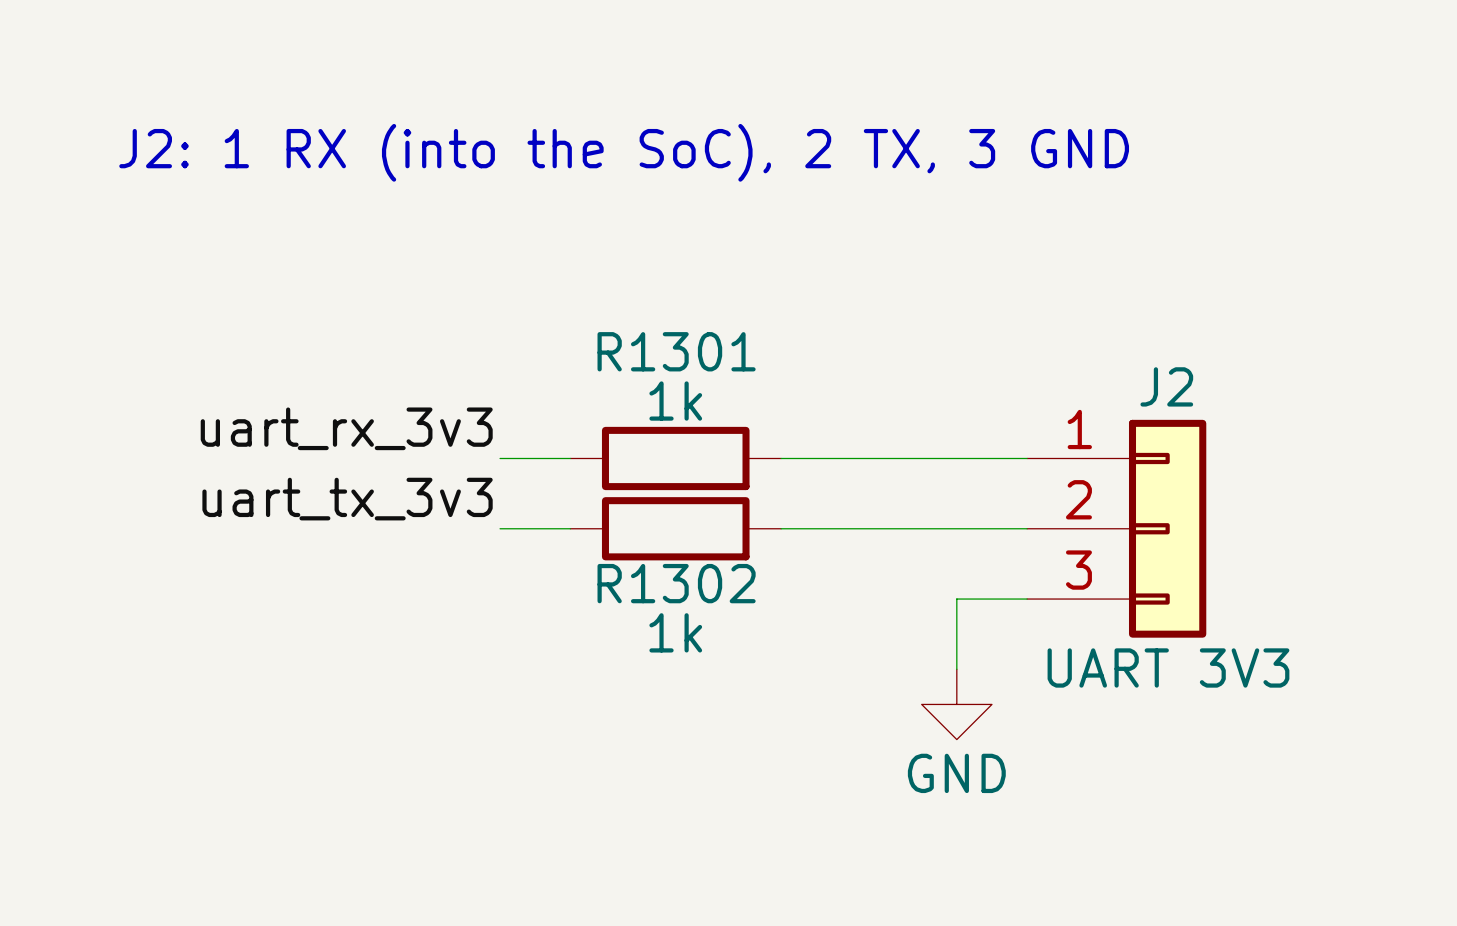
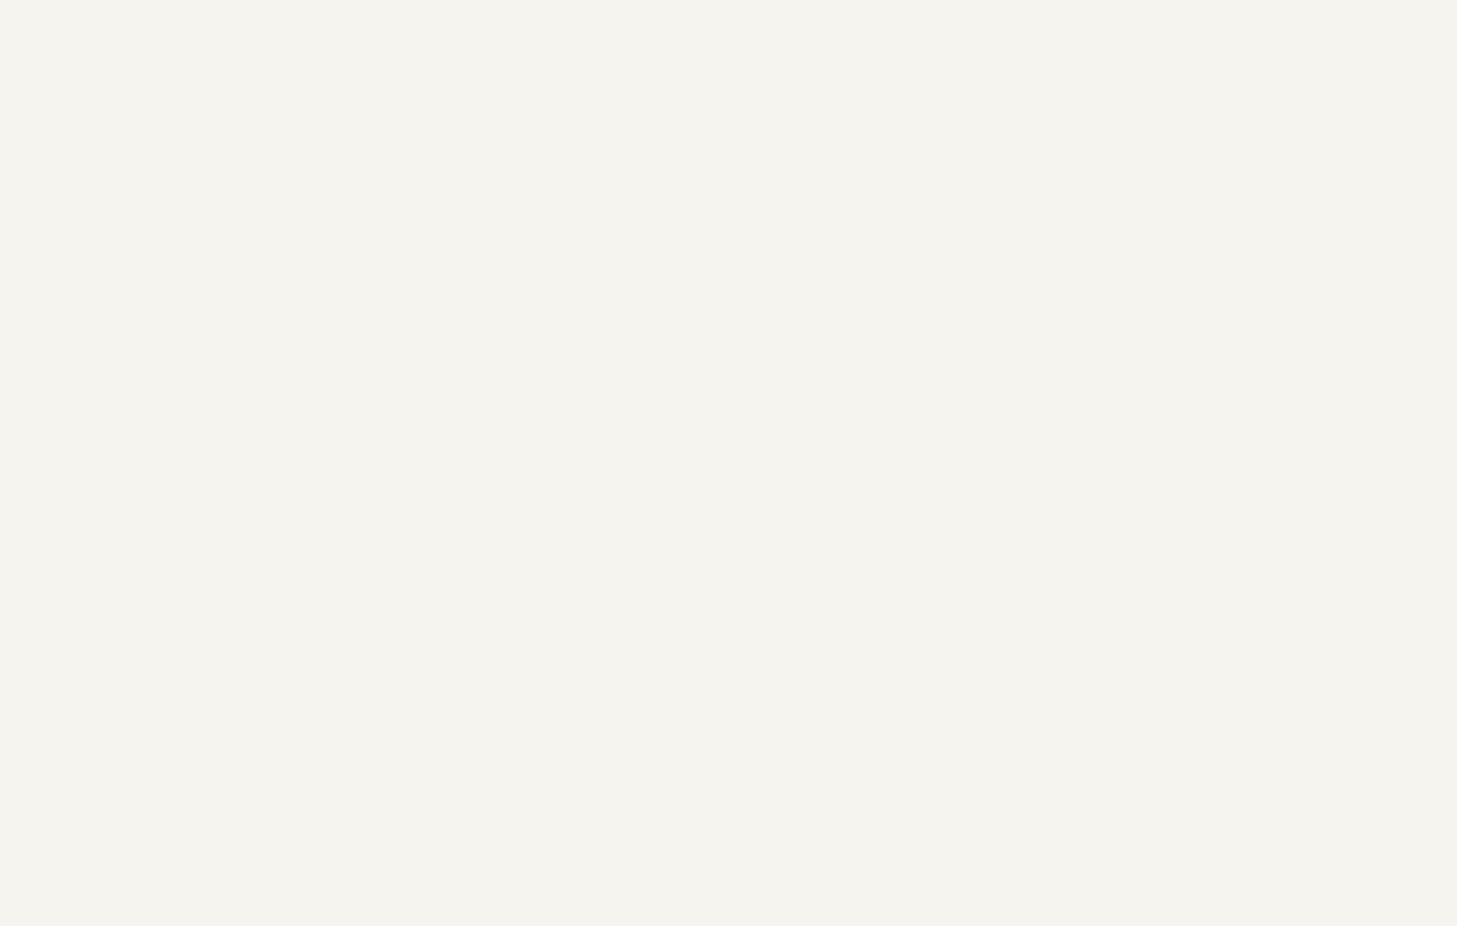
text: J2: 1 RX (into the SoC), 2 TX, 3 GND (624, 152) -> none
label: uart_rx_3v3 (346, 428) -> none
wire: (500, 458) (570, 458) -> none
R1301: 1k (675, 458) -> none
wire: (781, 458) (1027, 458) -> none
label: uart_tx_3v3 (347, 499) -> none
wire: (500, 528) (570, 528) -> none
R1302: 1k (675, 528) -> none
wire: (781, 528) (1027, 528) -> none
J2: UART 3V3 (1116, 528) -> none
wire: (1027, 599) (956, 599) (956, 669) -> none
power symbol: GND (956, 704) -> none

